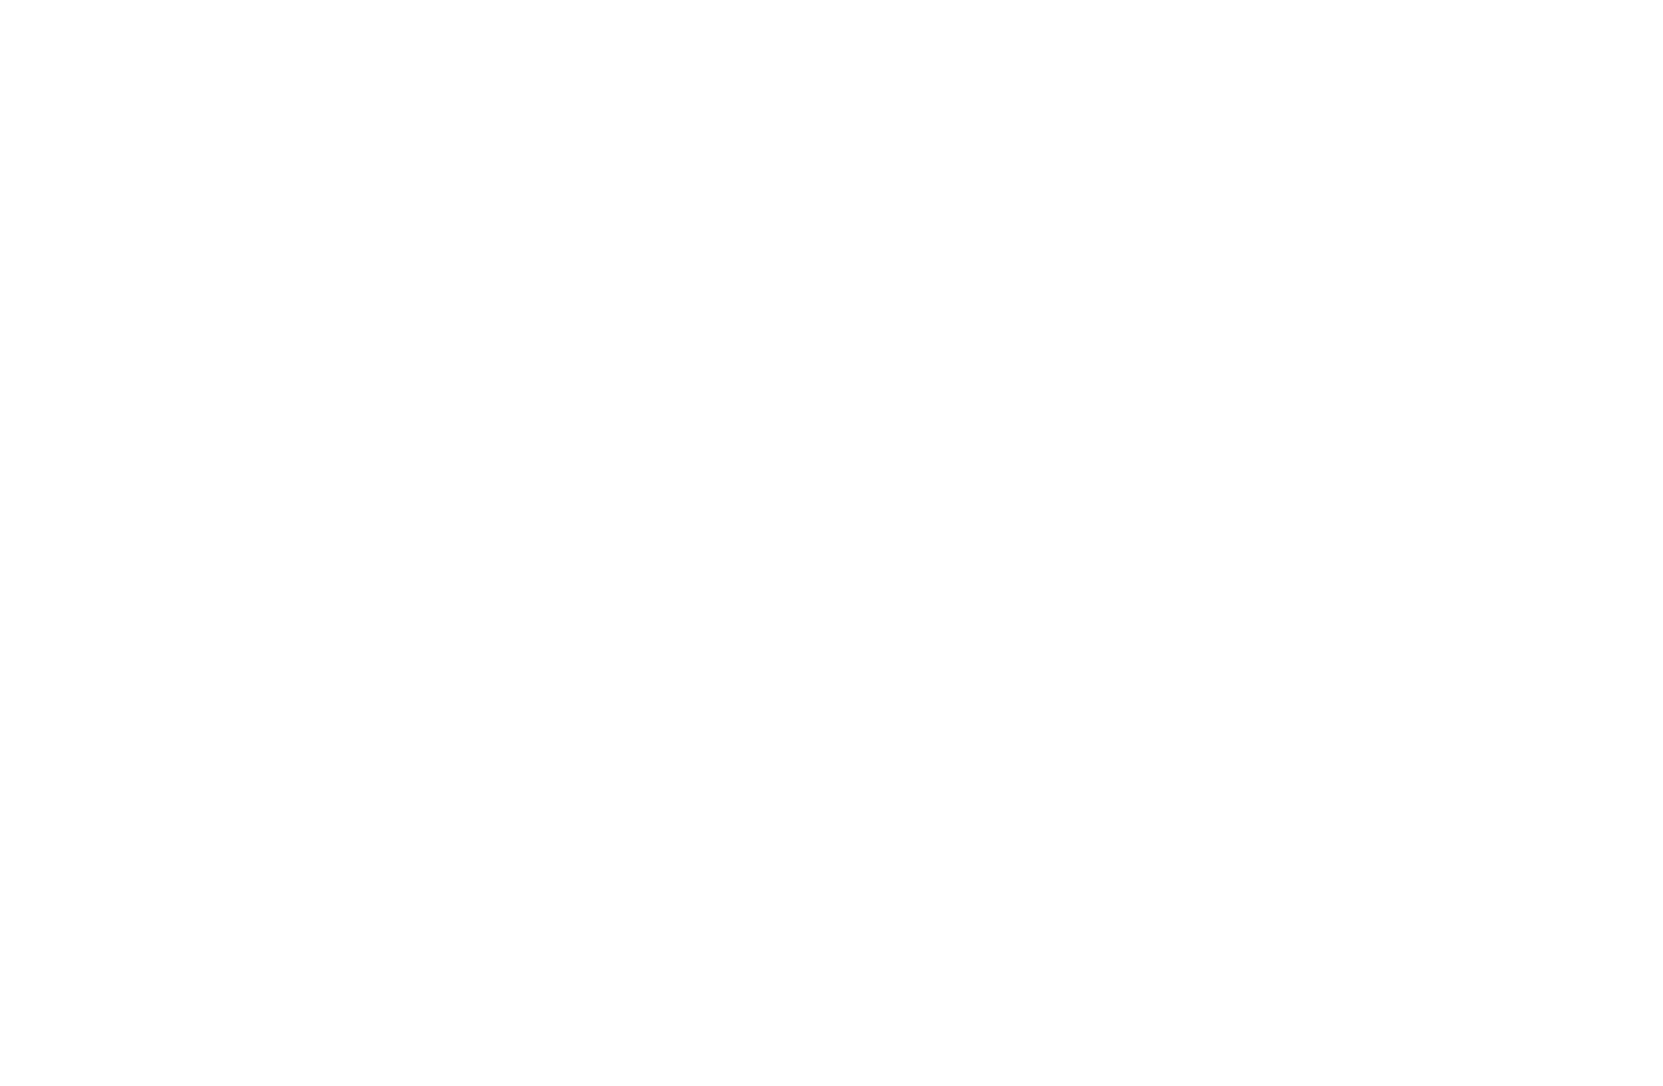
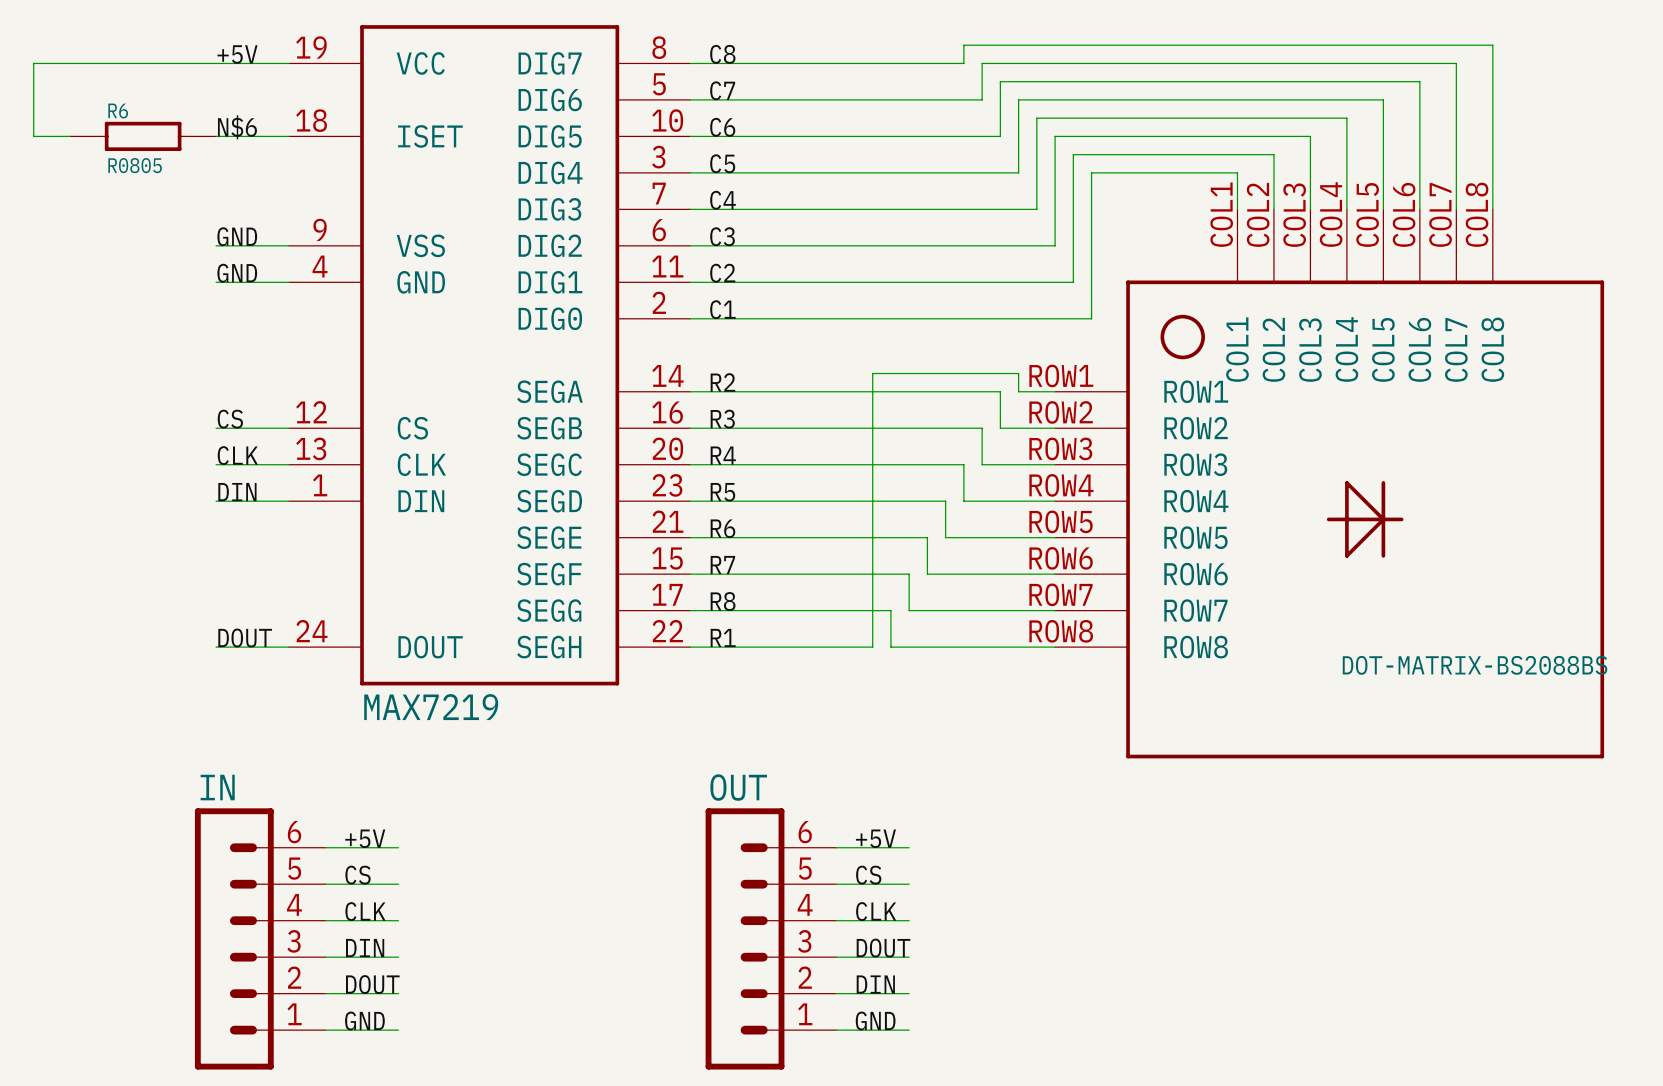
label: none -> +5V (237, 54)
label: none -> C8 (722, 54)
wire: none -> (289, 63) (33, 63) (33, 136) (70, 136)
wire: none -> (690, 63) (963, 63) (963, 45) (1492, 45) (1492, 209)
label: none -> C7 (722, 90)
wire: none -> (690, 99) (982, 99) (982, 63) (1456, 63) (1456, 209)
label: none -> N$6 (237, 127)
label: none -> C6 (722, 127)
R6: none -> R0805 (143, 136)
wire: none -> (216, 136) (289, 136)
wire: none -> (690, 136) (1000, 136) (1000, 81) (1419, 81) (1419, 209)
label: none -> C5 (722, 163)
wire: none -> (690, 172) (1018, 172) (1018, 99) (1383, 99) (1383, 209)
label: none -> C4 (723, 200)
wire: none -> (690, 209) (1036, 209) (1036, 118) (1346, 118) (1346, 209)
wire: none -> (1237, 209) (1237, 172) (1091, 172) (1091, 318) (690, 318)
wire: none -> (1273, 209) (1273, 154) (1073, 154) (1073, 282) (690, 282)
wire: none -> (1310, 209) (1310, 136) (1055, 136) (1055, 245) (690, 245)
label: none -> GND (237, 236)
label: none -> C3 (722, 236)
wire: none -> (216, 245) (289, 245)
label: none -> GND (237, 273)
label: none -> C2 (722, 273)
wire: none -> (216, 282) (289, 282)
label: none -> C1 (722, 309)
part: none -> MAX7219 (489, 355)
label: none -> R2 (722, 382)
wire: none -> (690, 391) (1000, 391) (1000, 428) (1055, 428)
wire: none -> (1055, 391) (1018, 391) (1018, 373) (872, 373) (872, 647) (690, 647)
label: none -> CS (230, 419)
label: none -> R3 (722, 419)
wire: none -> (216, 428) (289, 428)
wire: none -> (690, 428) (982, 428) (982, 464) (1055, 464)
label: none -> CLK (237, 455)
label: none -> R4 (723, 455)
wire: none -> (216, 464) (289, 464)
wire: none -> (690, 464) (963, 464) (963, 501) (1055, 501)
part: none -> DOT-MATRIX-BS2088BS (1329, 483)
label: none -> DIN (237, 492)
label: none -> R5 (722, 492)
wire: none -> (216, 501) (289, 501)
wire: none -> (690, 501) (945, 501) (945, 537) (1055, 537)
label: none -> R6 (722, 528)
wire: none -> (690, 537) (927, 537) (927, 574) (1055, 574)
label: none -> R7 (722, 565)
wire: none -> (690, 574) (909, 574) (909, 610) (1055, 610)
label: none -> R8 (723, 601)
wire: none -> (690, 610) (890, 610) (890, 647) (1055, 647)
label: none -> DOUT (245, 637)
label: none -> R1 (723, 637)
wire: none -> (216, 647) (289, 647)
label: none -> +5V (365, 838)
label: none -> +5V (875, 838)
wire: none -> (325, 847) (398, 847)
wire: none -> (836, 847) (909, 847)
label: none -> CS (358, 875)
label: none -> CS (868, 875)
wire: none -> (325, 884) (398, 884)
wire: none -> (836, 884) (909, 884)
label: none -> CLK (365, 911)
label: none -> CLK (876, 911)
wire: none -> (325, 920) (398, 920)
wire: none -> (836, 920) (909, 920)
IN: none -> (260, 938)
OUT: none -> (770, 938)
label: none -> DIN (365, 948)
label: none -> DOUT (883, 948)
wire: none -> (325, 957) (398, 957)
wire: none -> (836, 957) (909, 957)
label: none -> DOUT (372, 984)
label: none -> DIN (875, 984)
wire: none -> (325, 993) (398, 993)
wire: none -> (836, 993) (909, 993)
label: none -> GND (364, 1021)
label: none -> GND (875, 1021)
wire: none -> (325, 1030) (398, 1030)
wire: none -> (836, 1030) (909, 1030)

